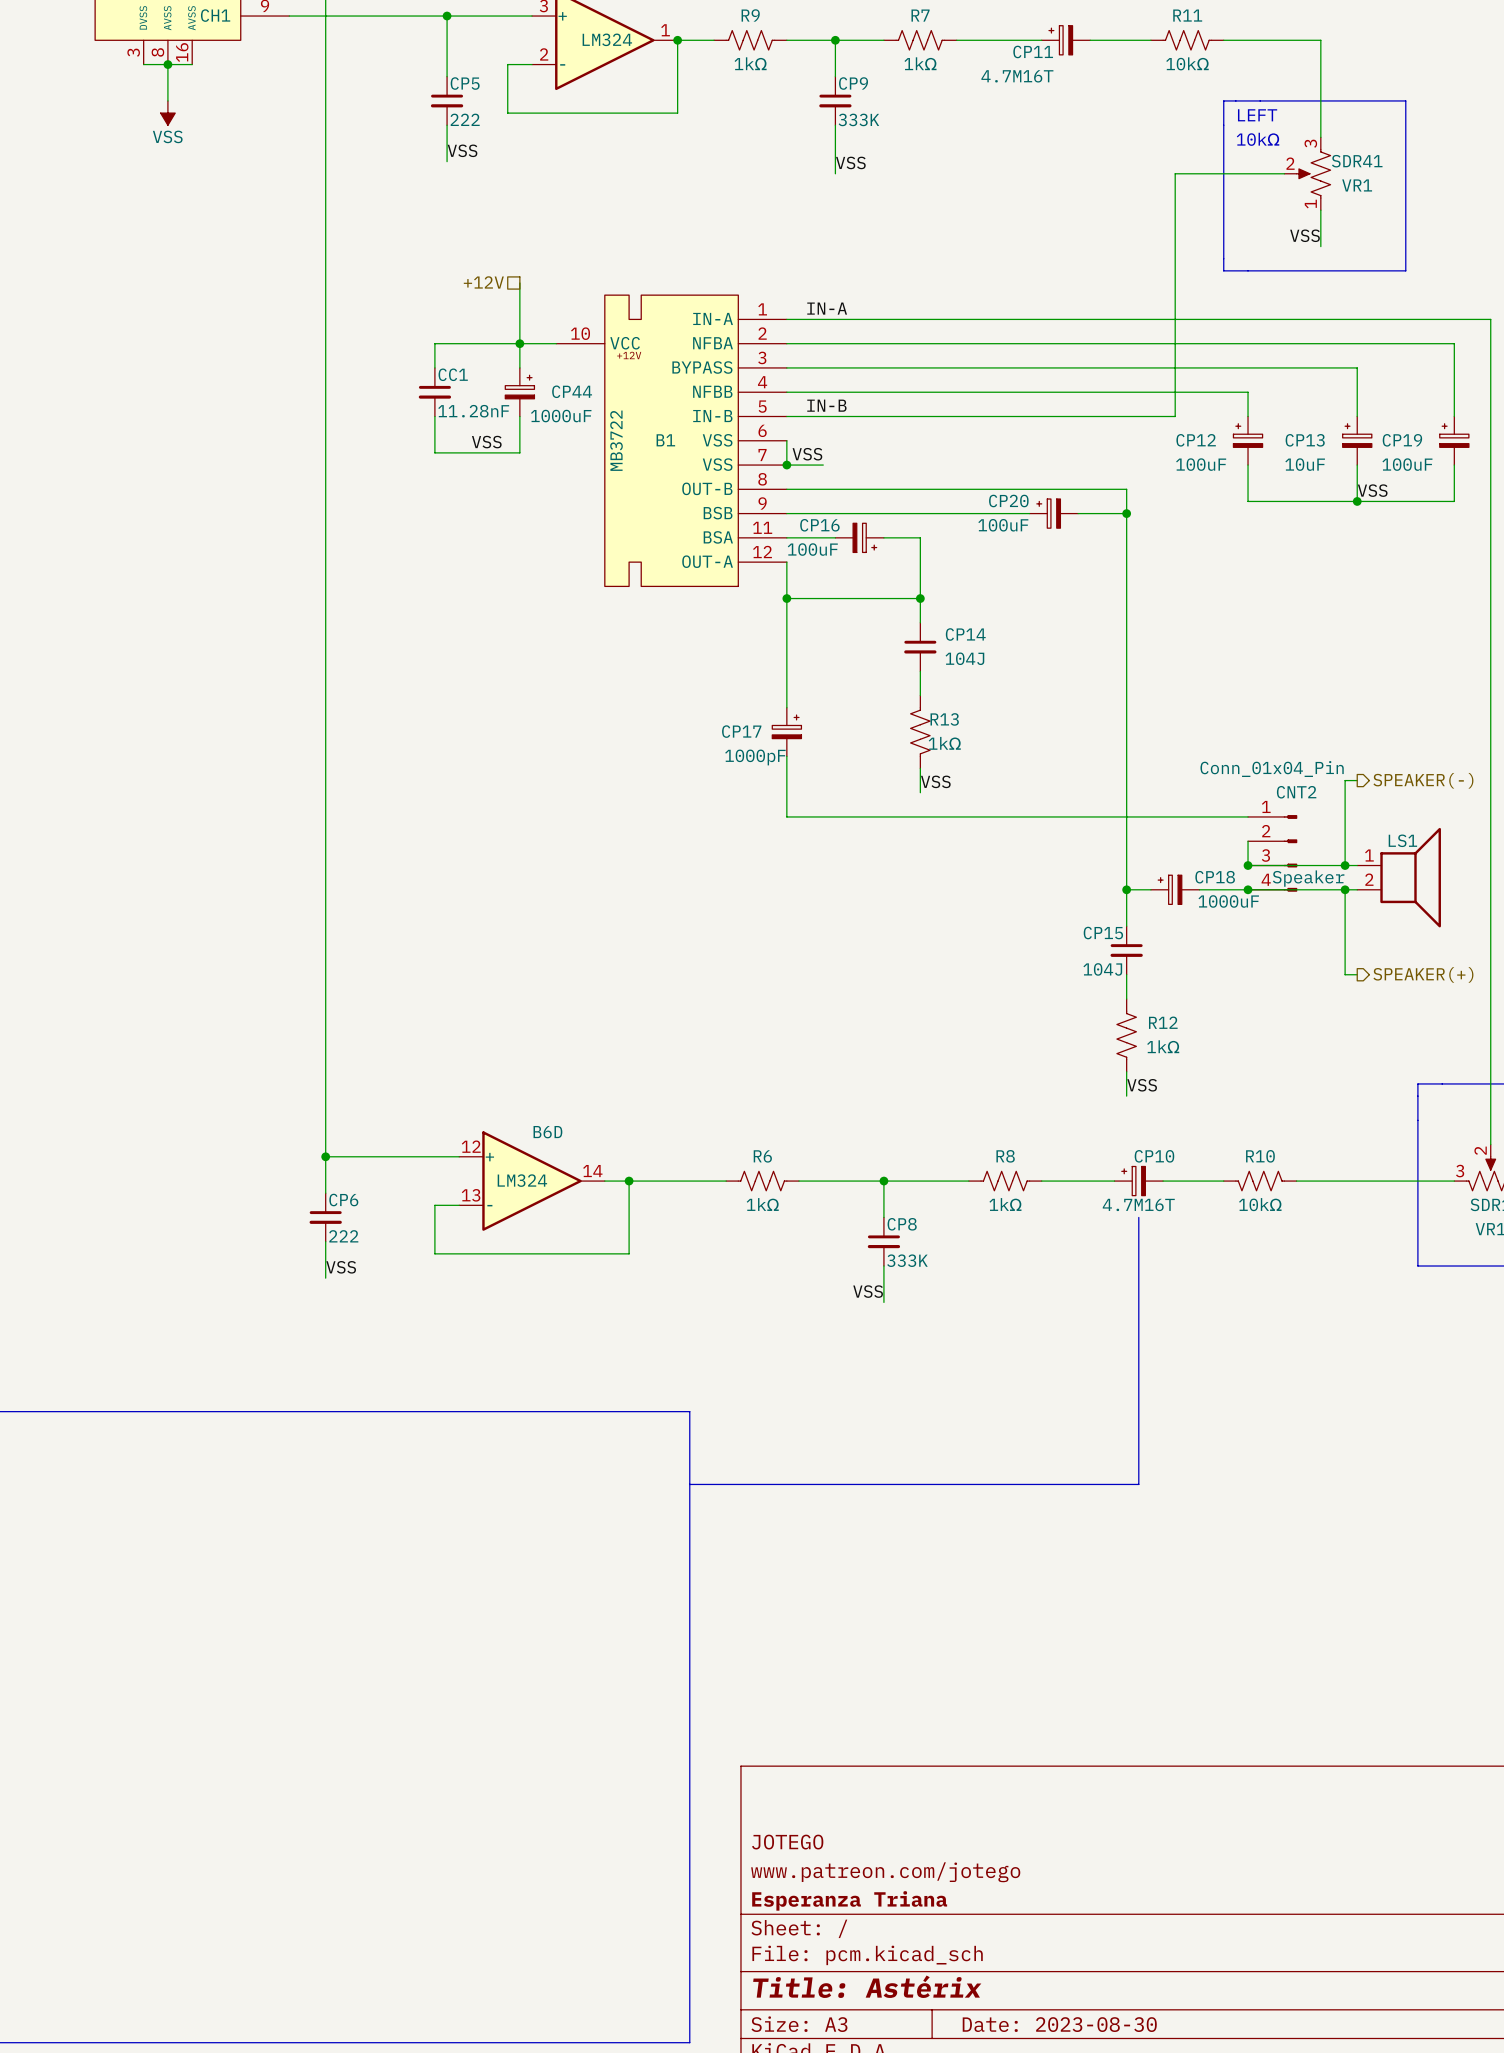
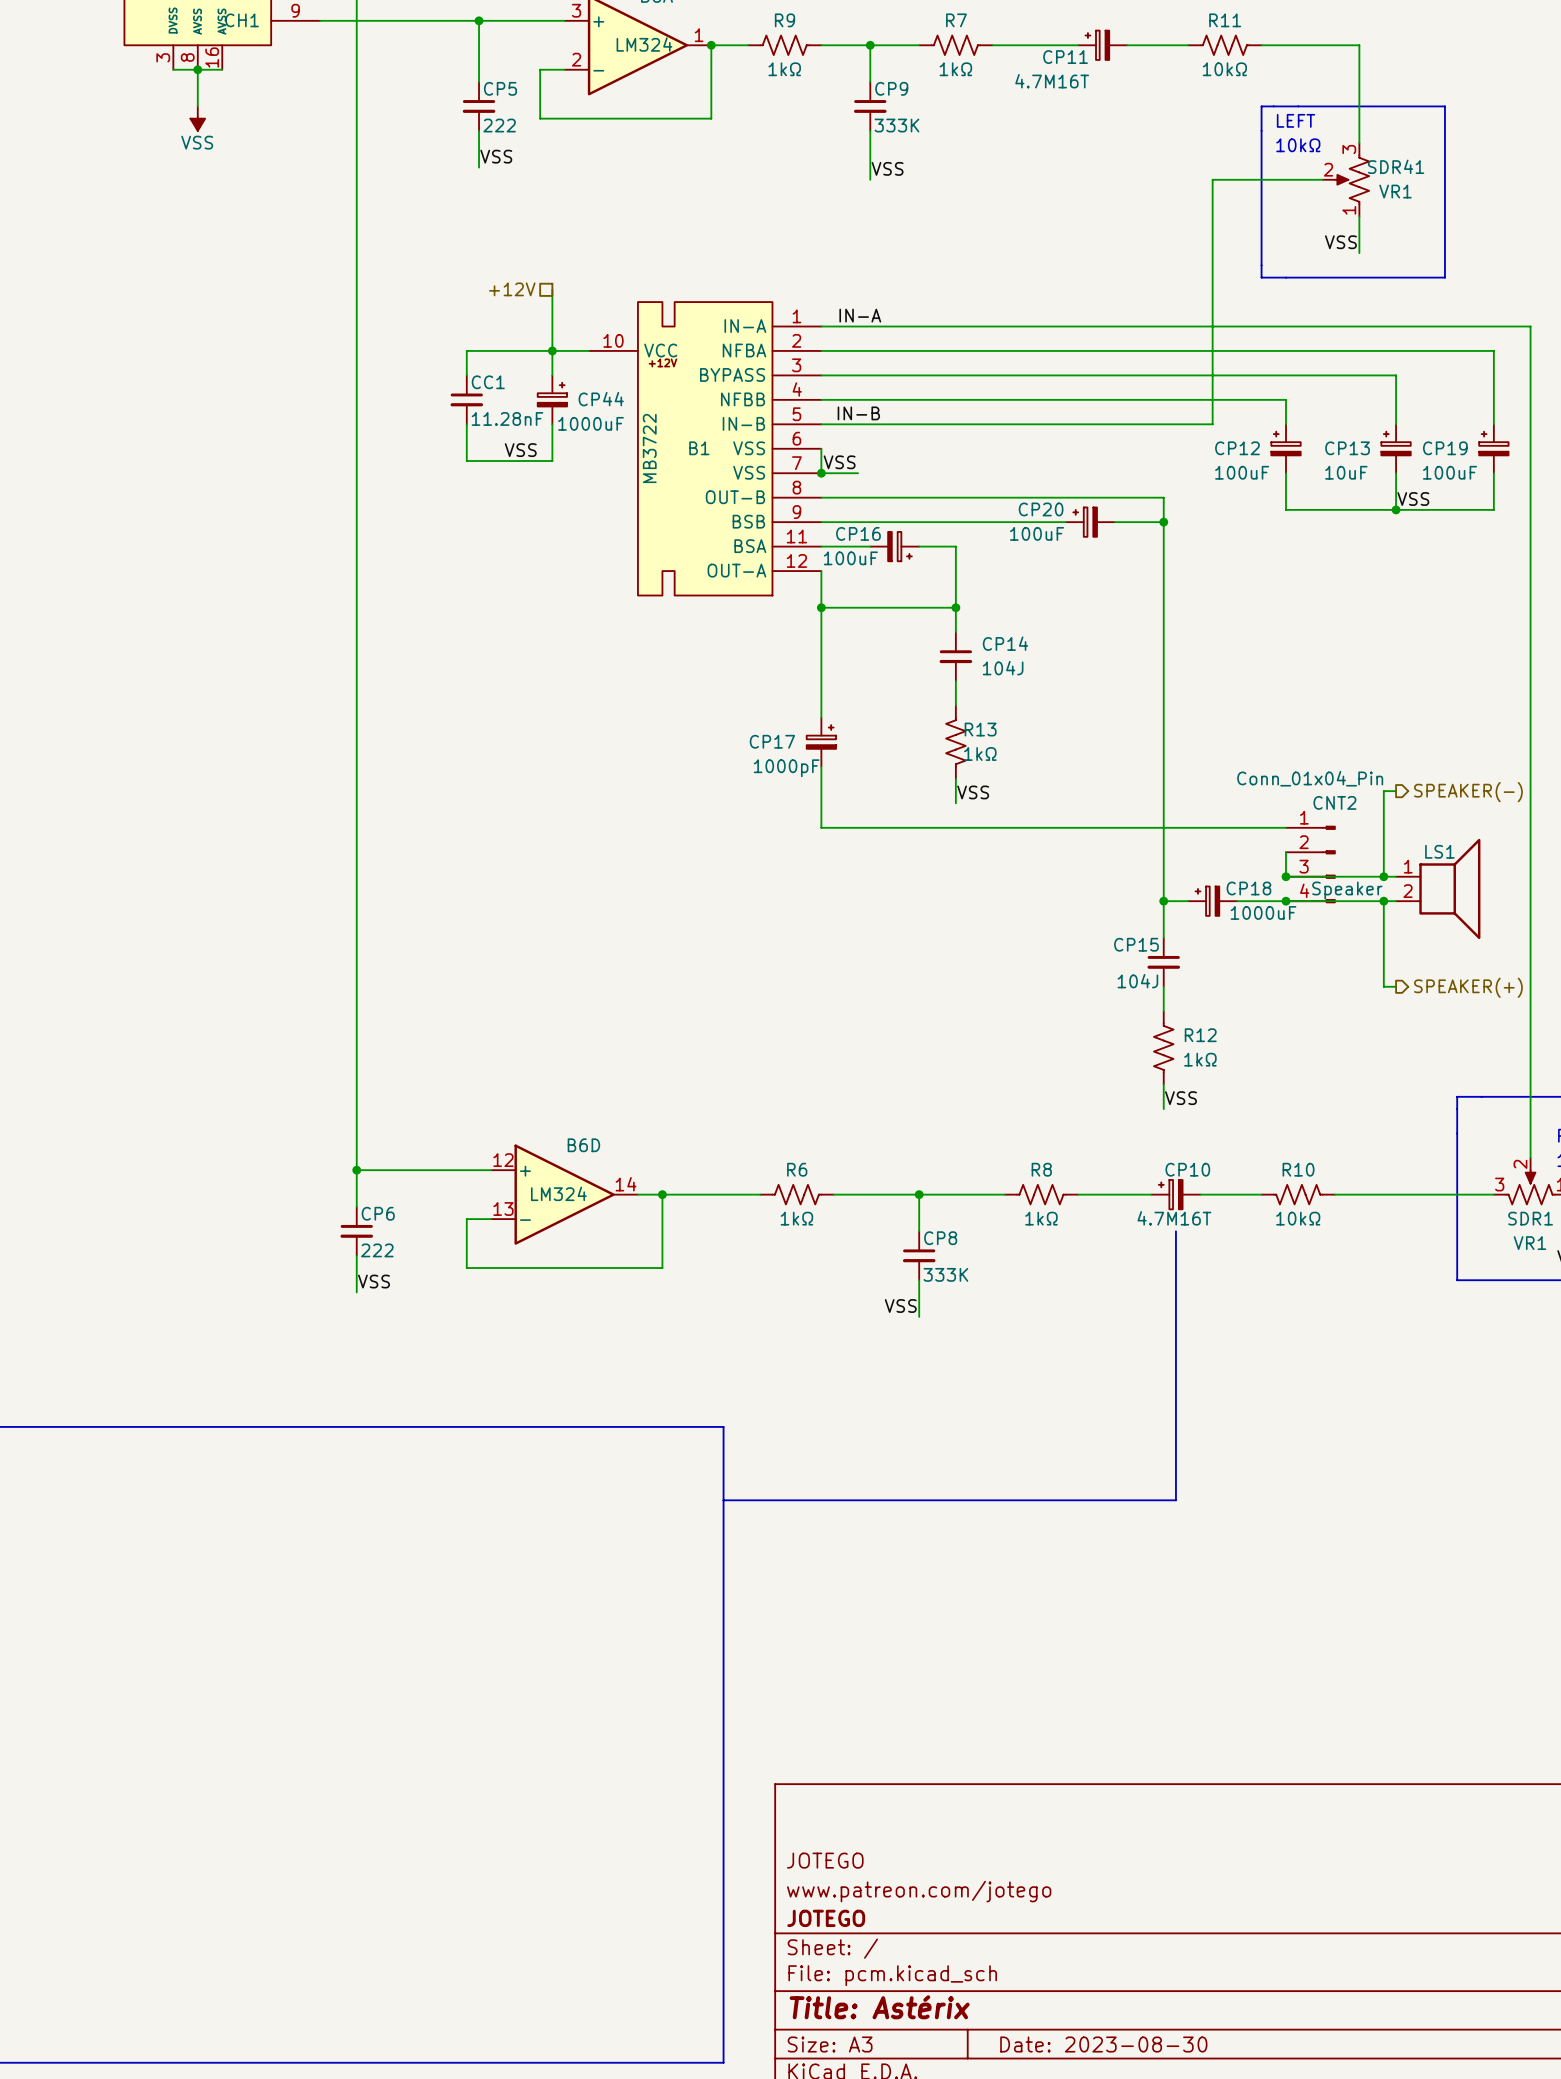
title block: Esperanza Triana (849, 1900) -> JOTEGO (826, 1918)

